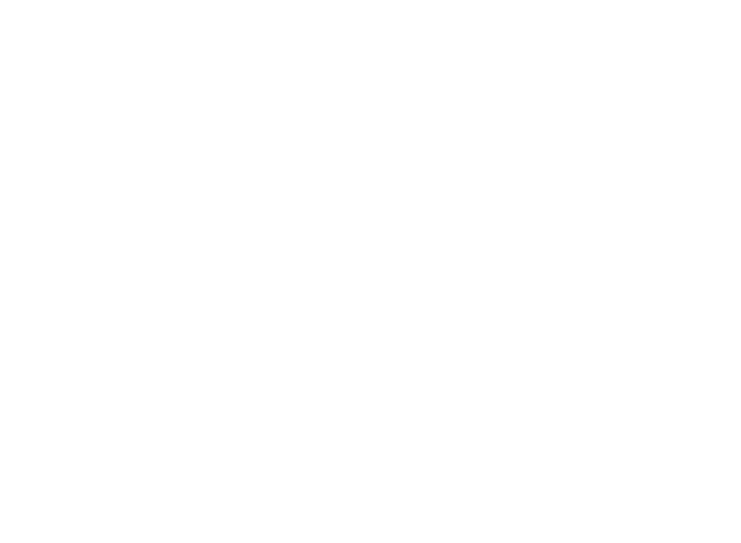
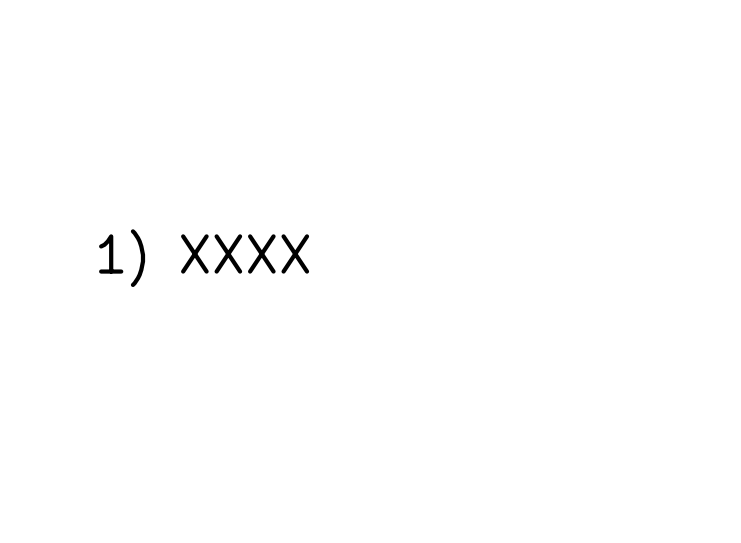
text: none -> 1) XXXX (204, 258)

